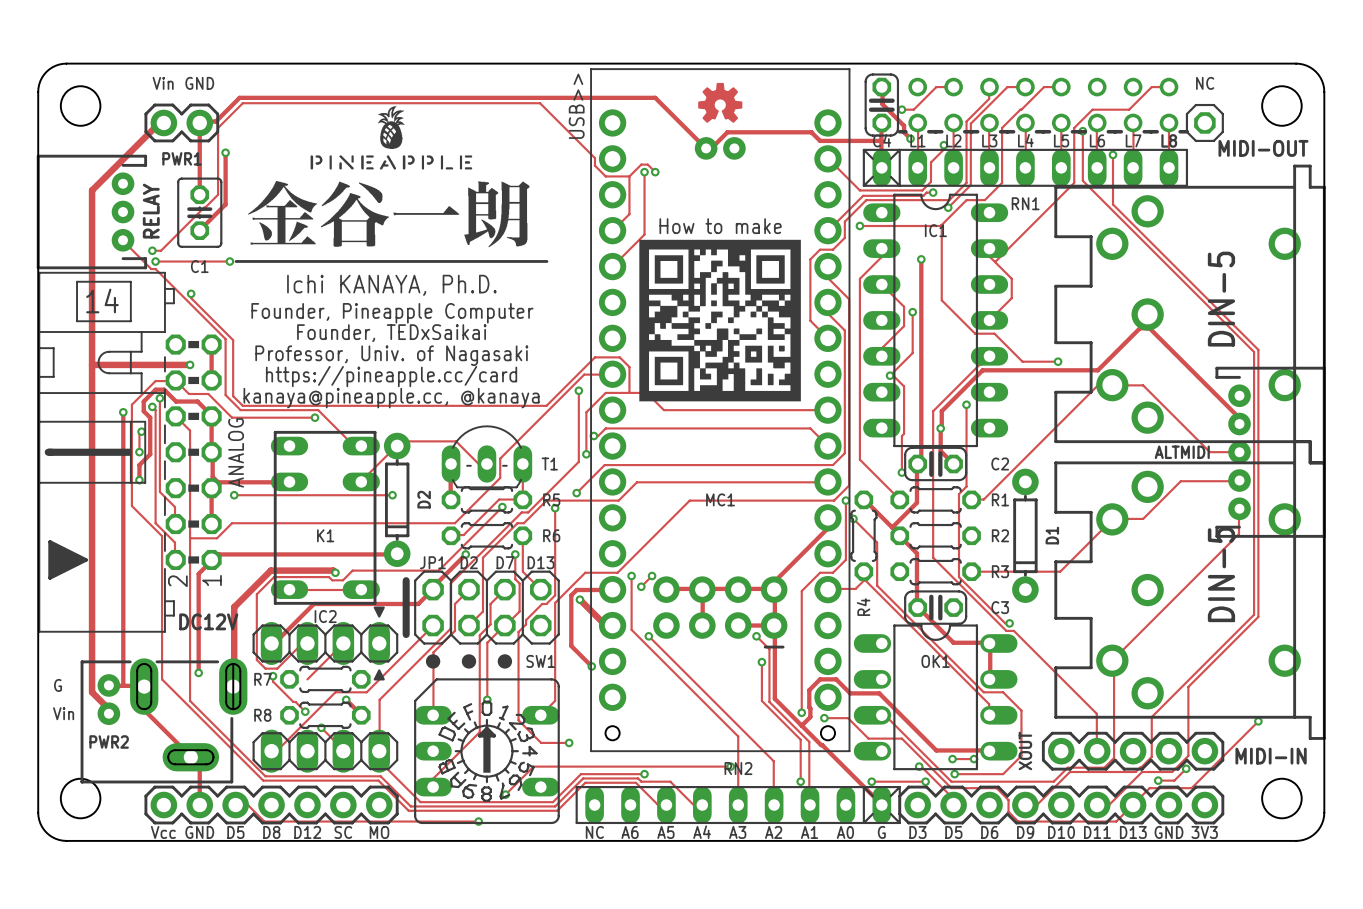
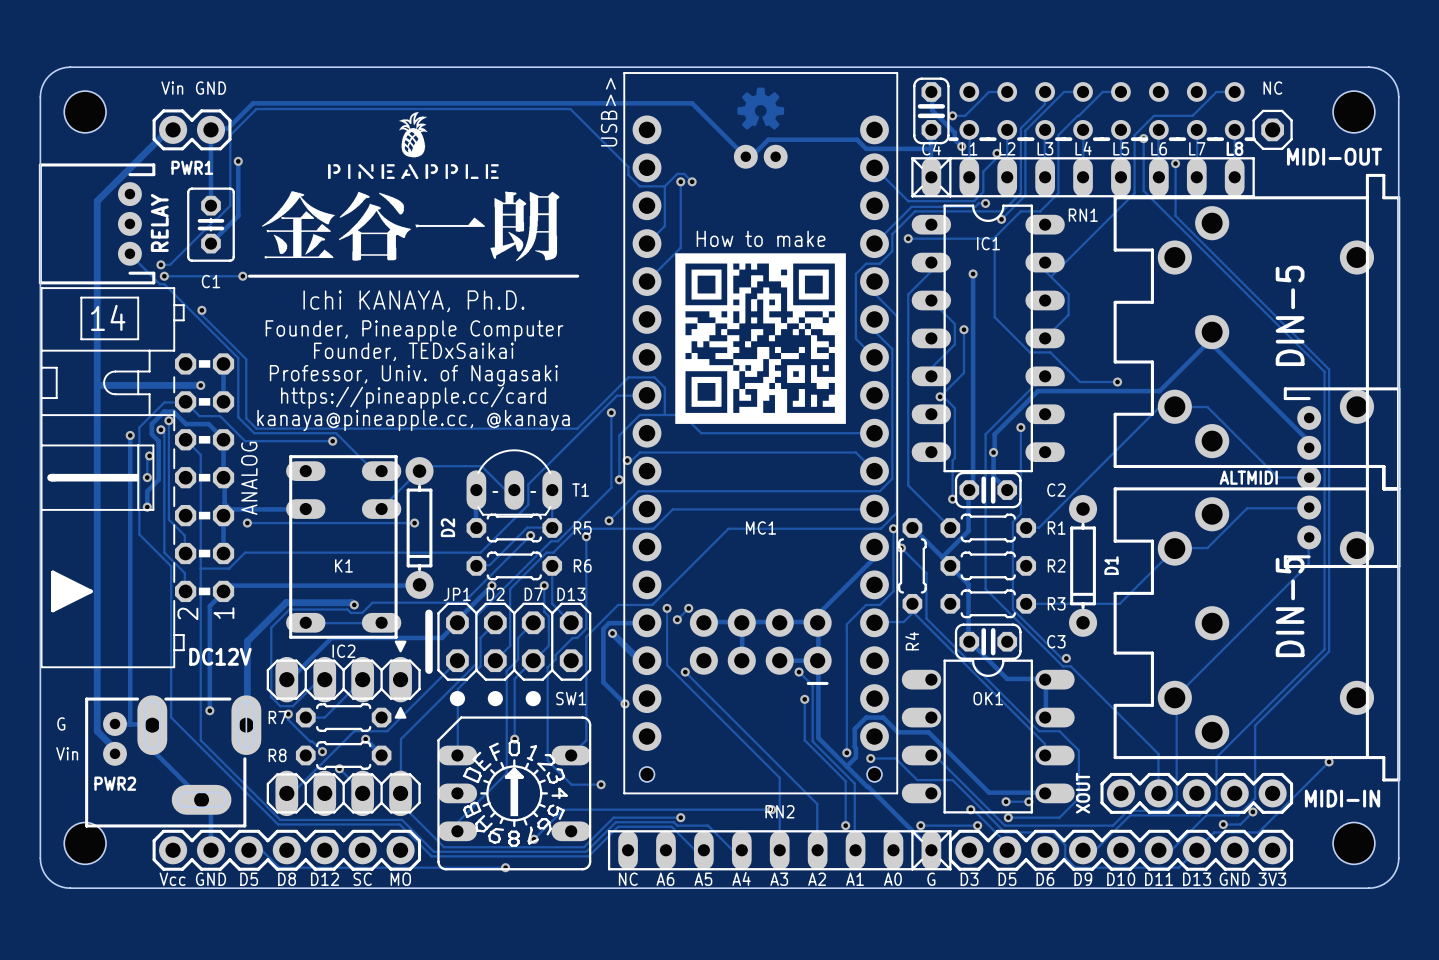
track: none -> (305, 717) (324, 717)

